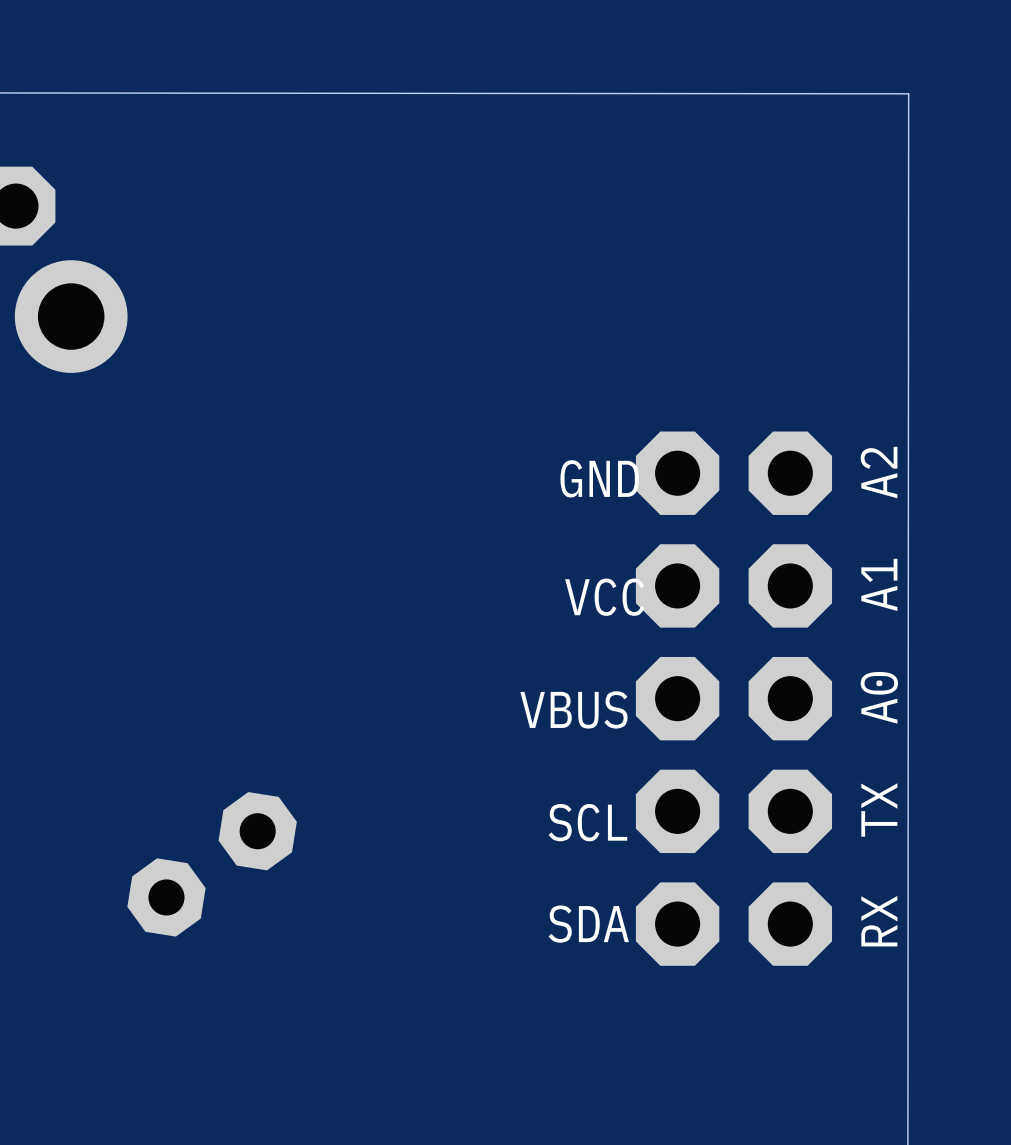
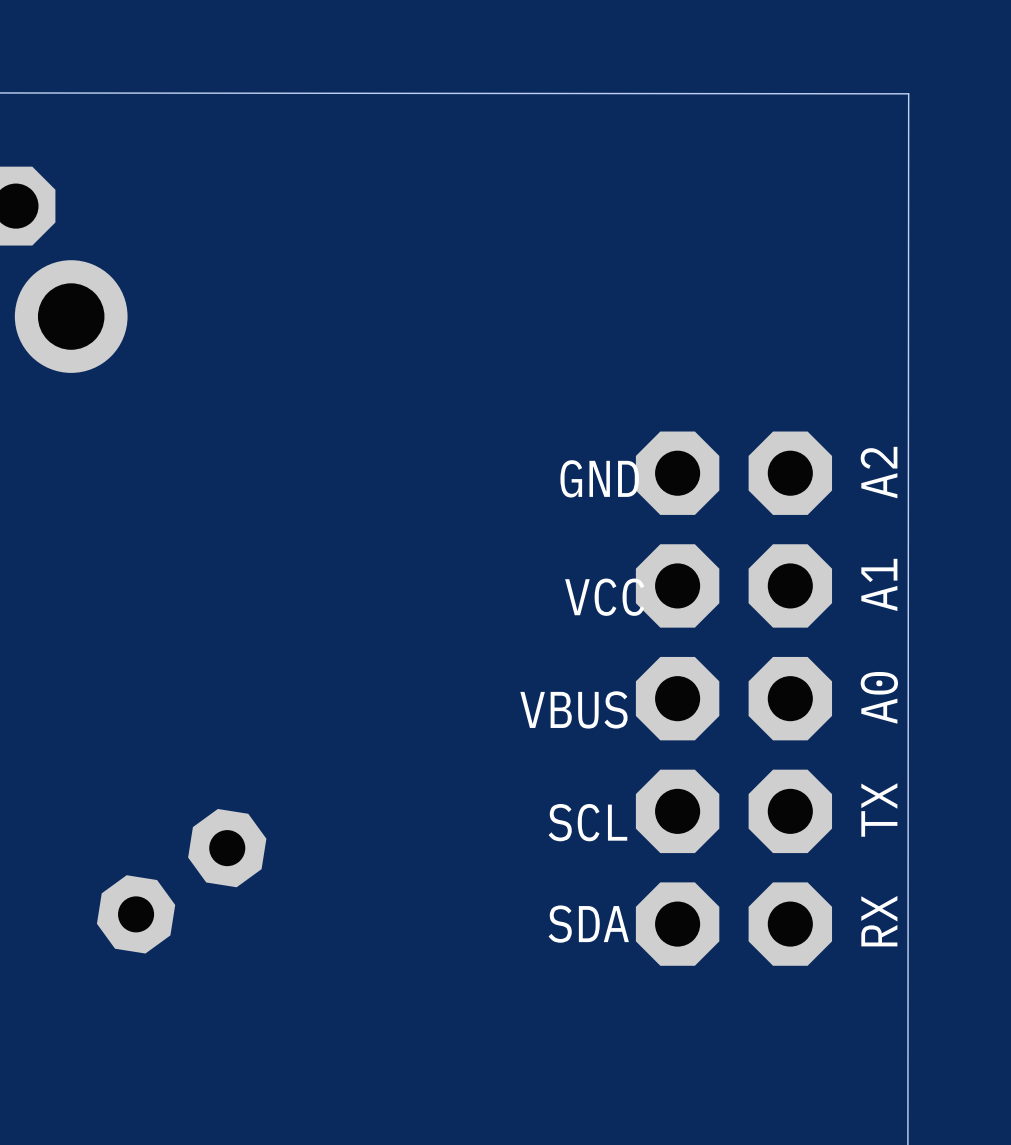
part position: (212, 864) -> (181, 881)

